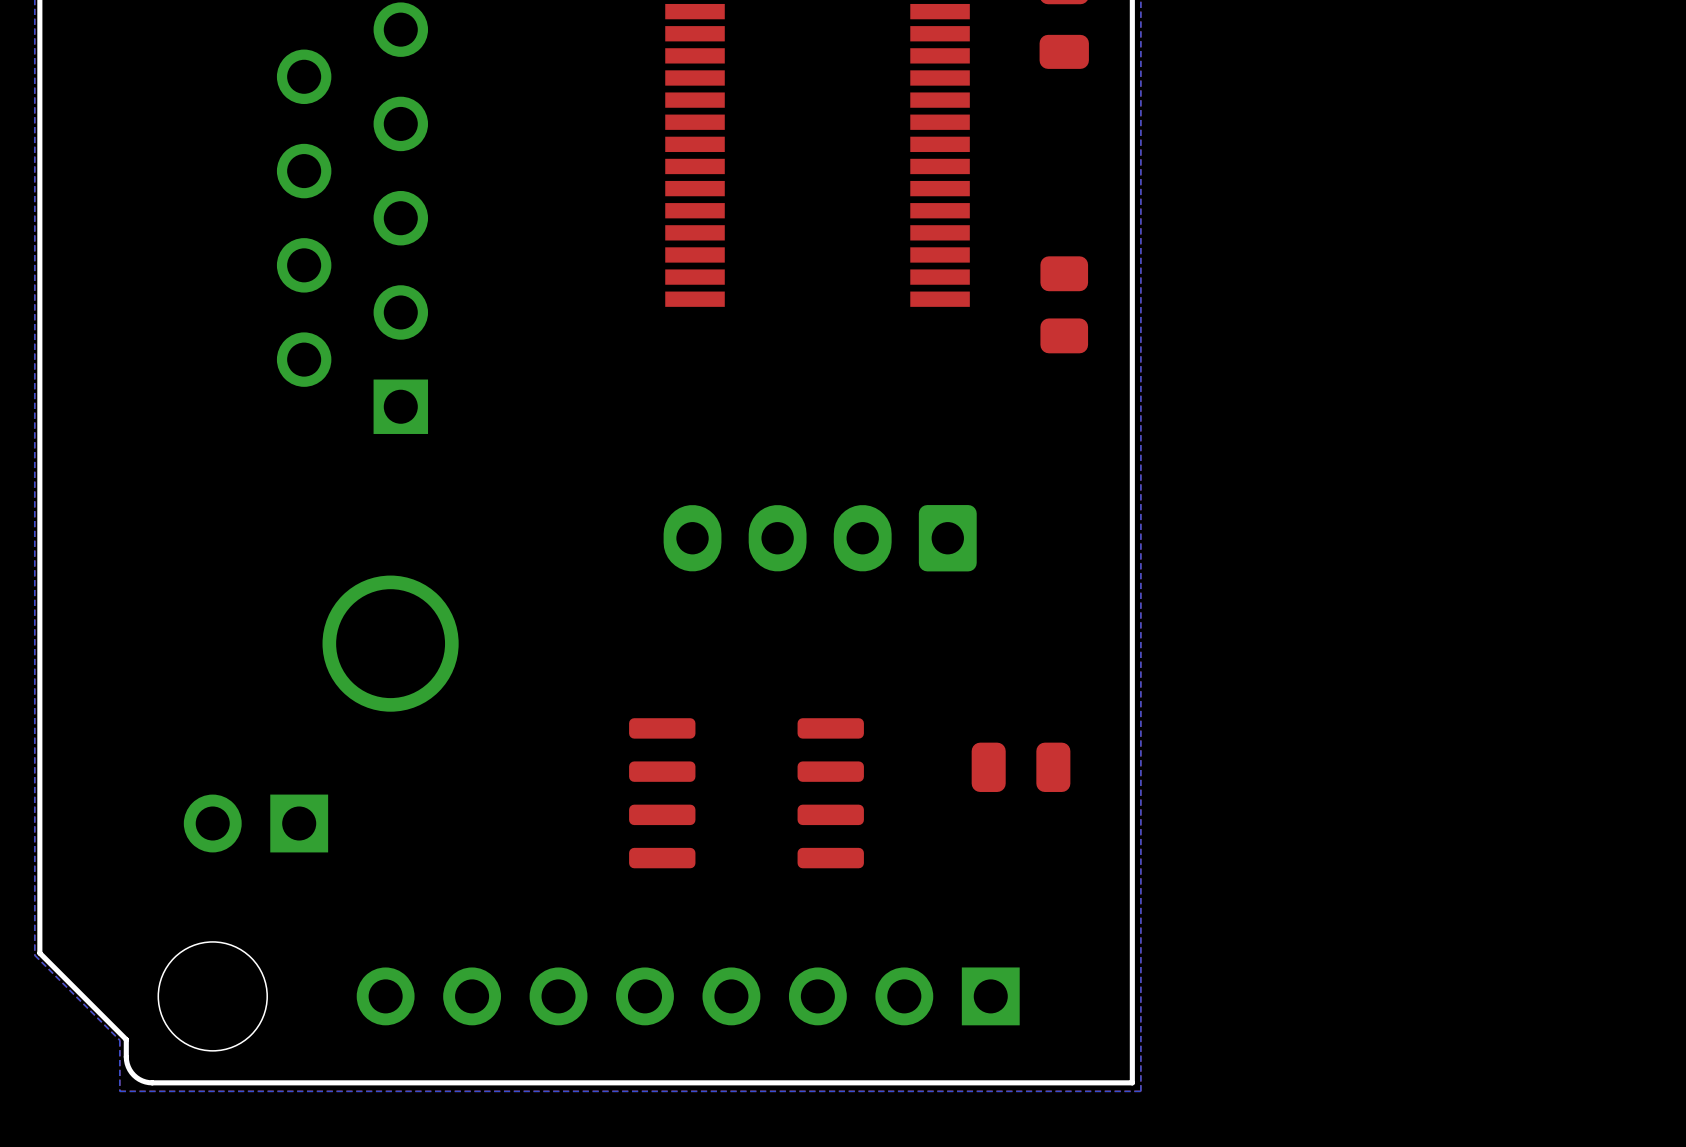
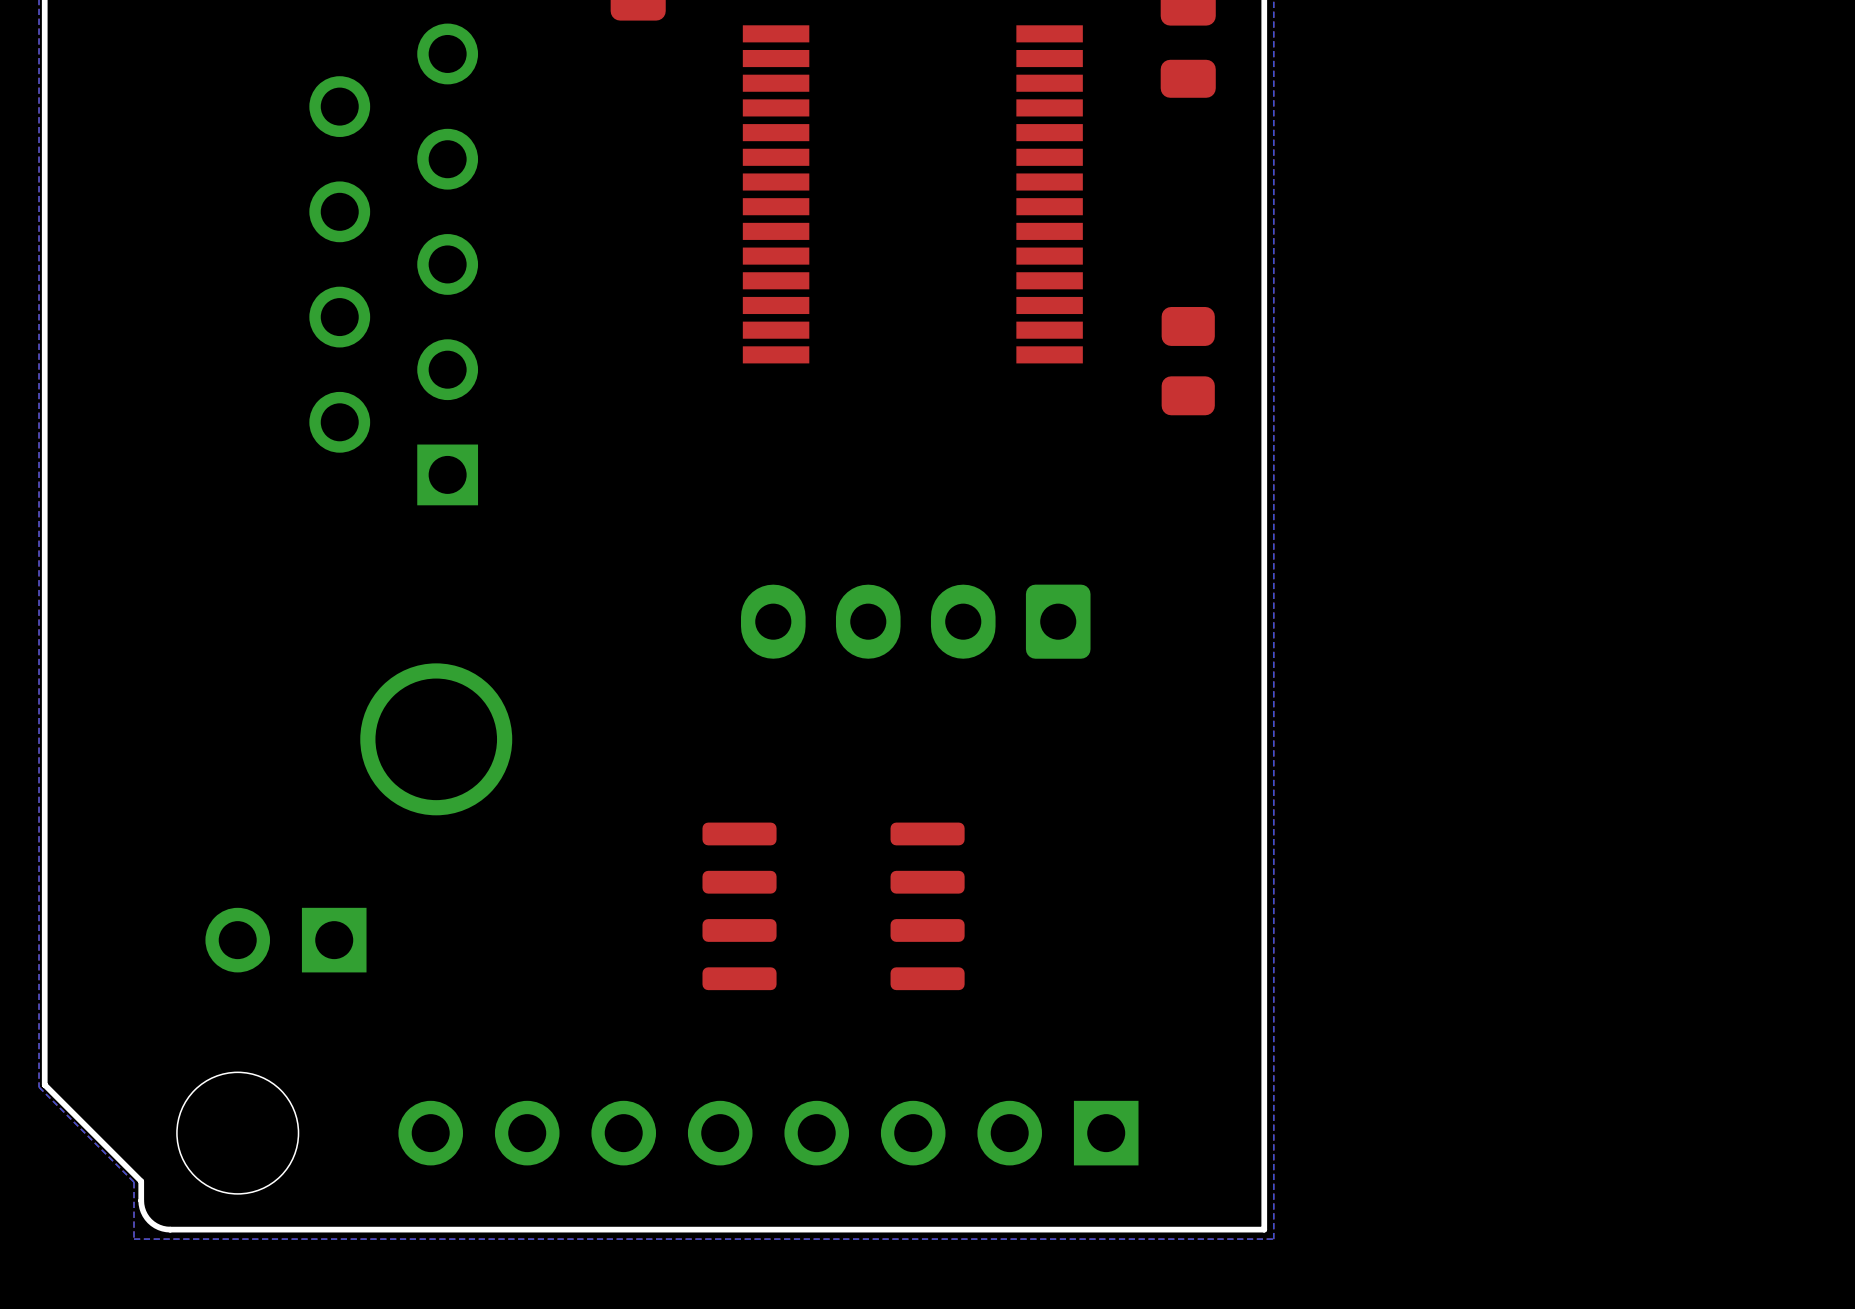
part: (1021, 767) -> none

